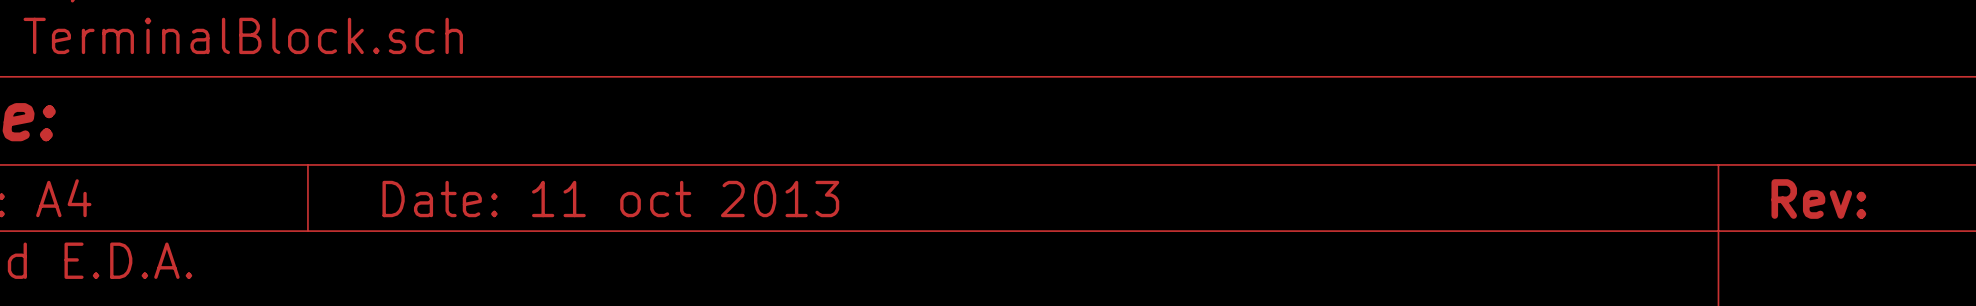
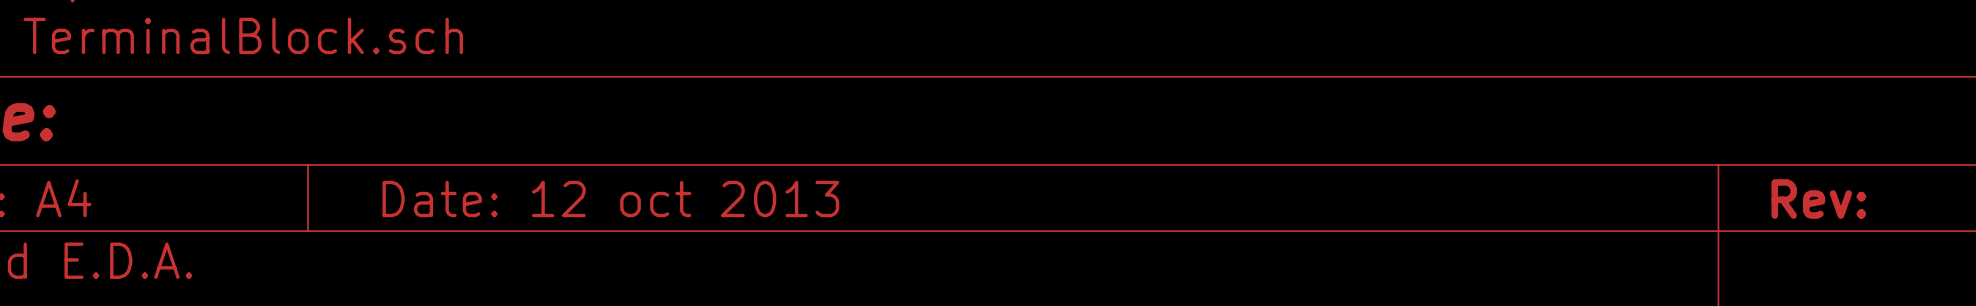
title block: Date: 11 oct 2013 (610, 199) -> Date: 12 oct 2013 (610, 199)

